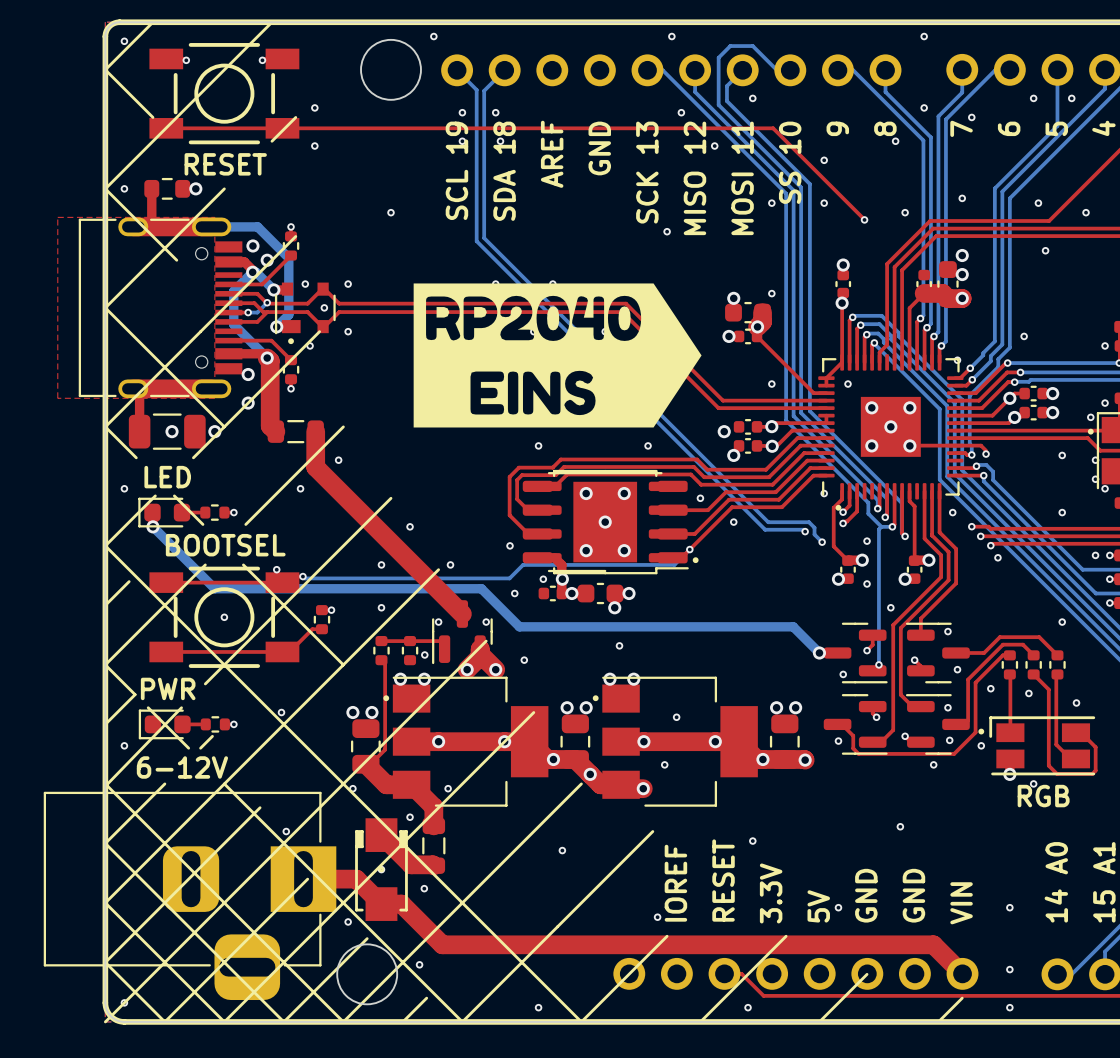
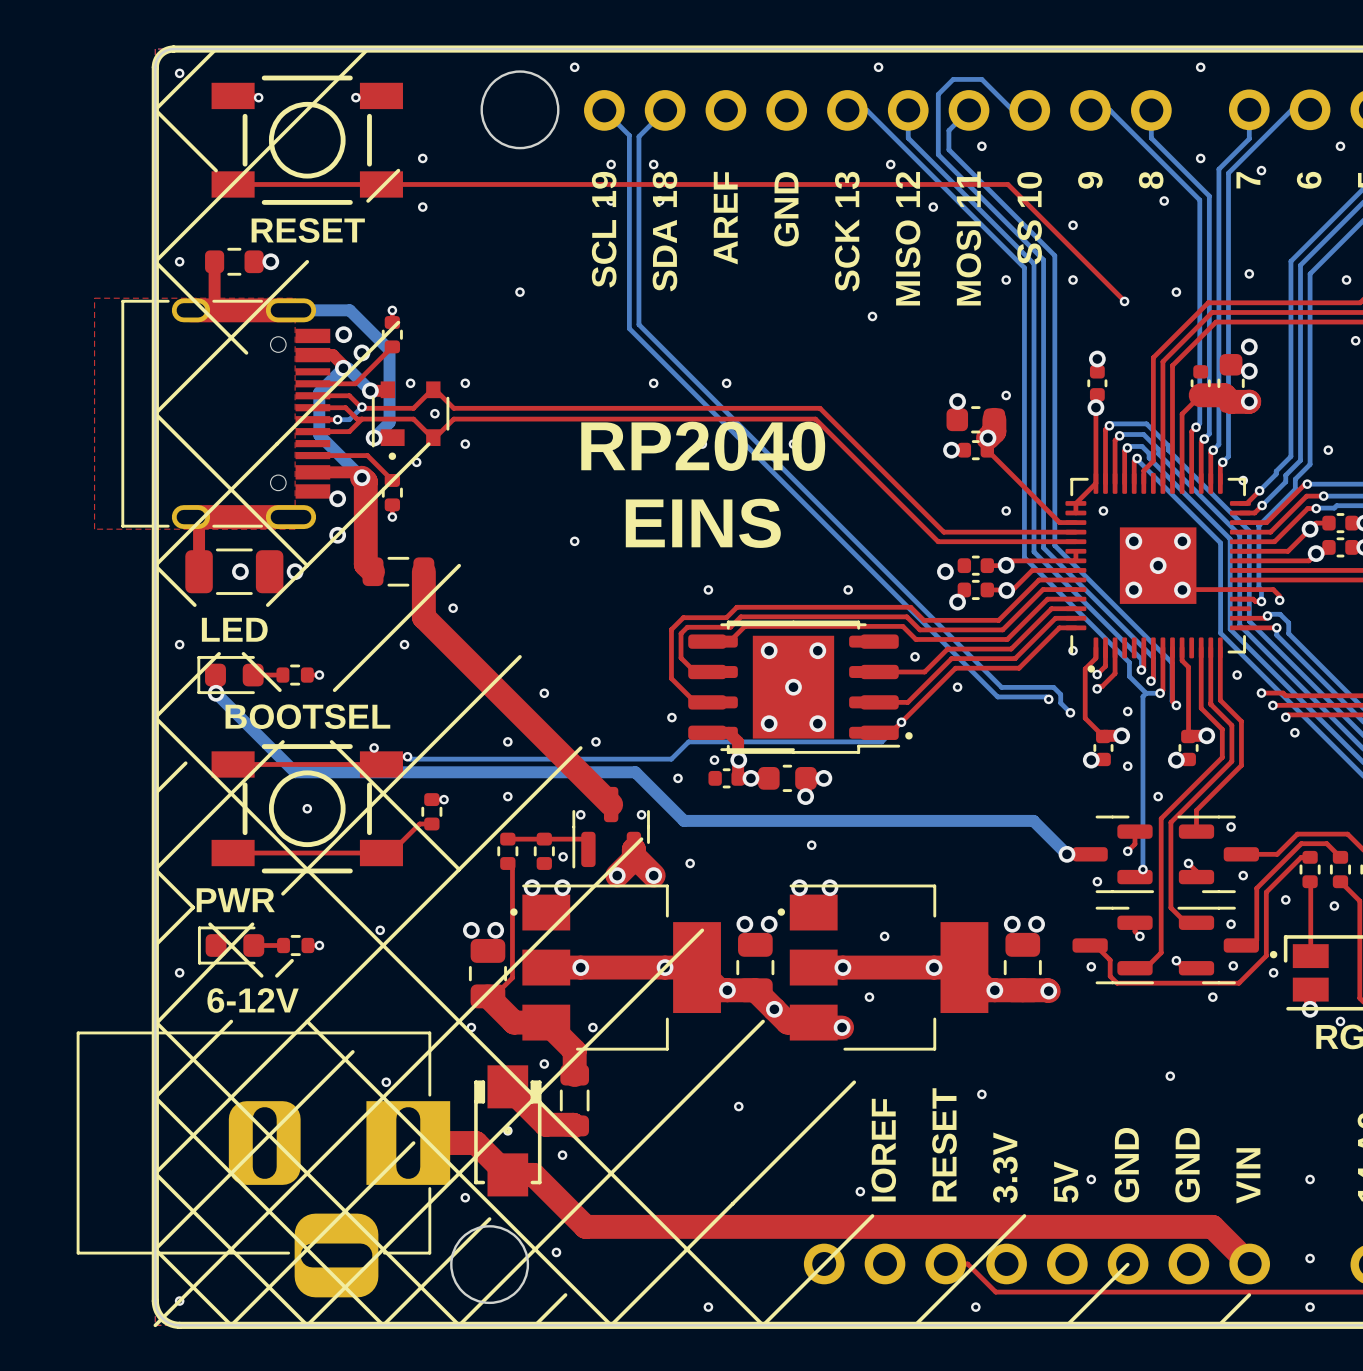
drawing: [413, 283, 702, 428] -> none
text: none -> RP2040 (703, 446)
text: none -> EINS (703, 523)

